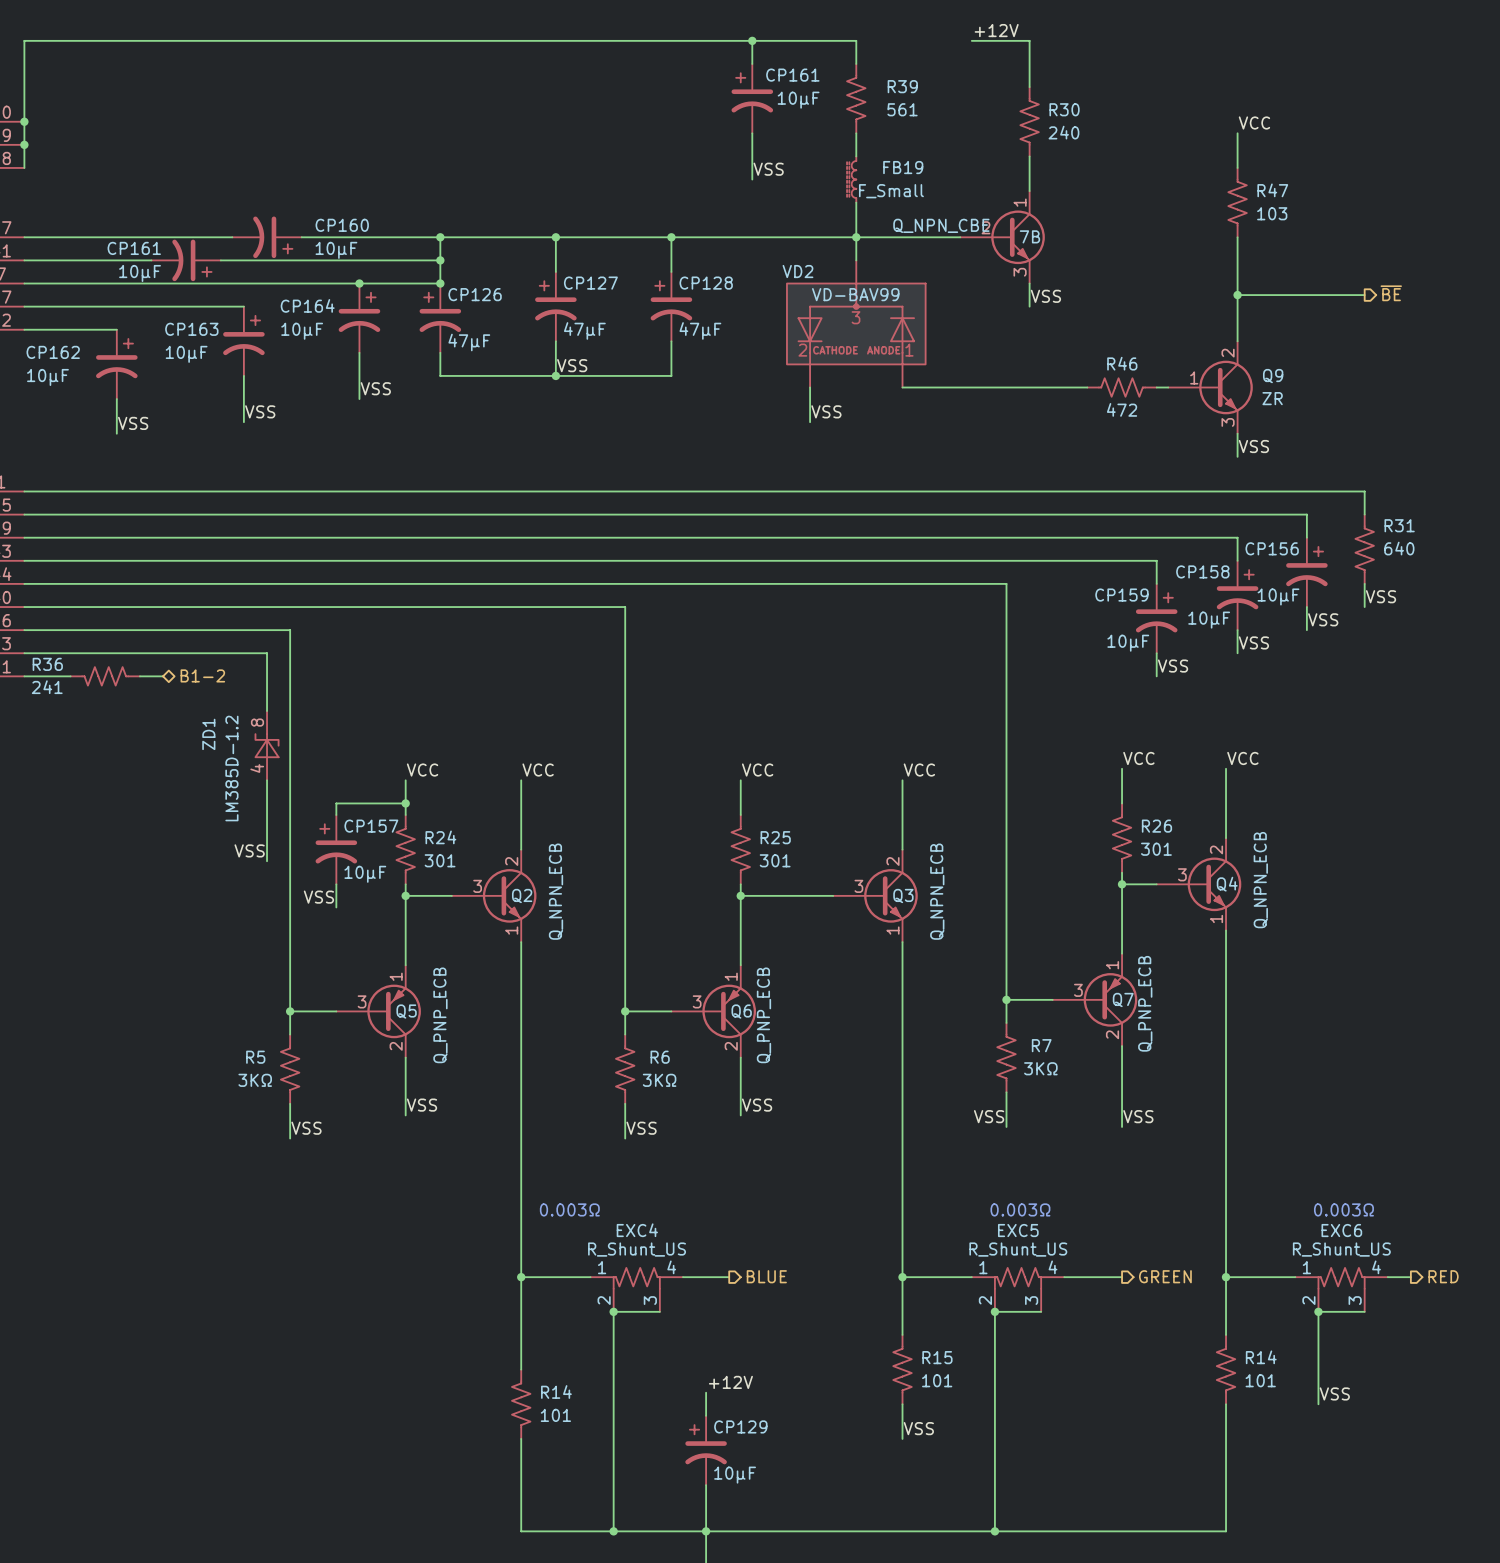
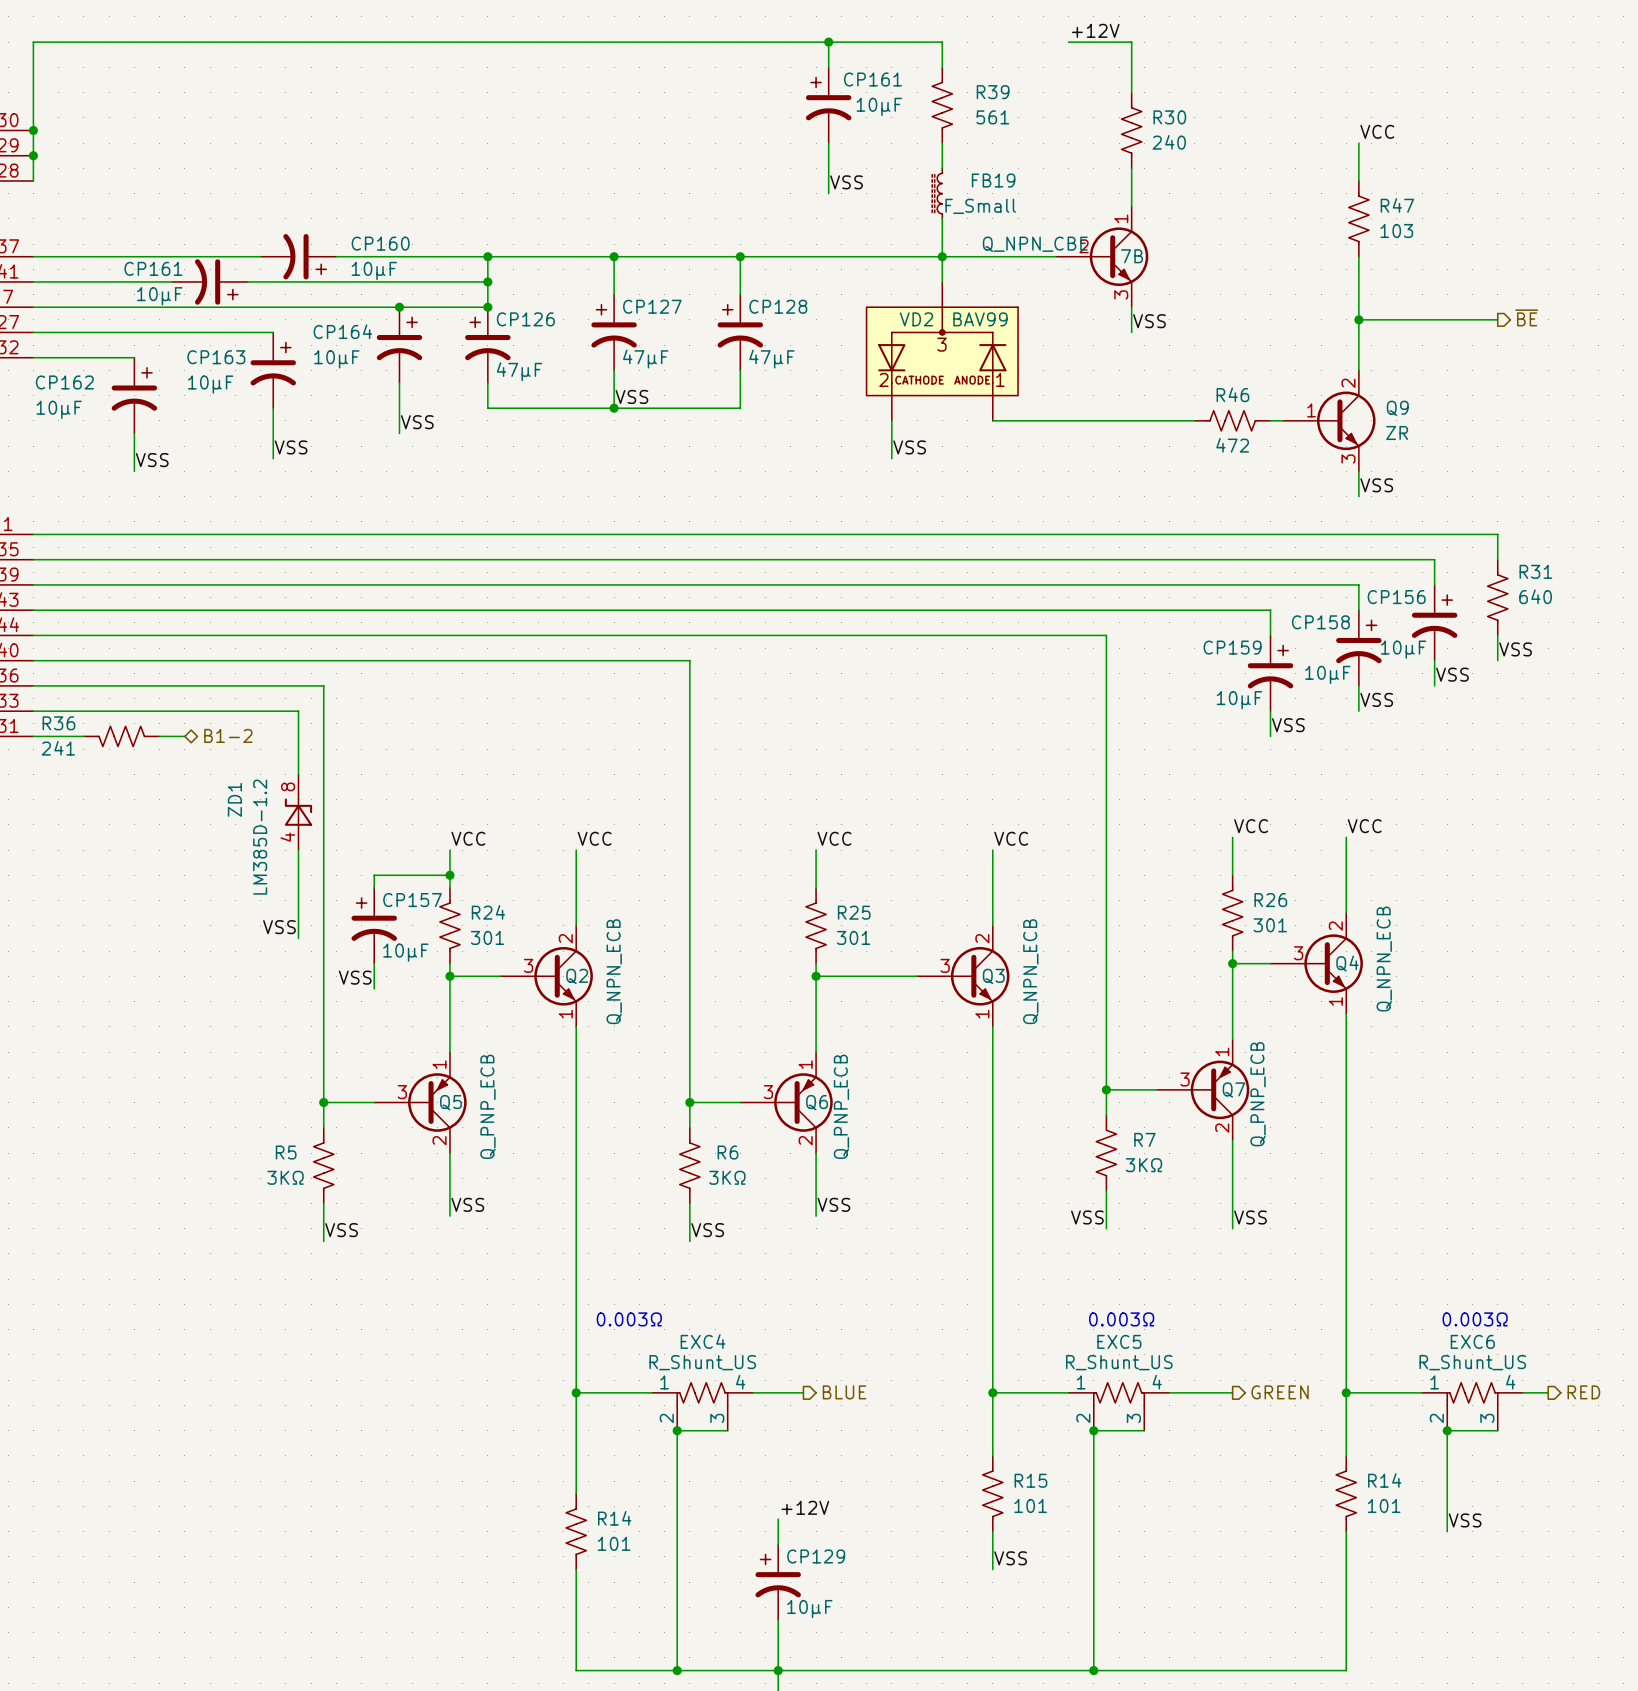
VD2 name position: VD2 (797, 271) -> VD2 (916, 319)
VD2 value: VD-BAV99 (855, 294) -> BAV99 (980, 319)

